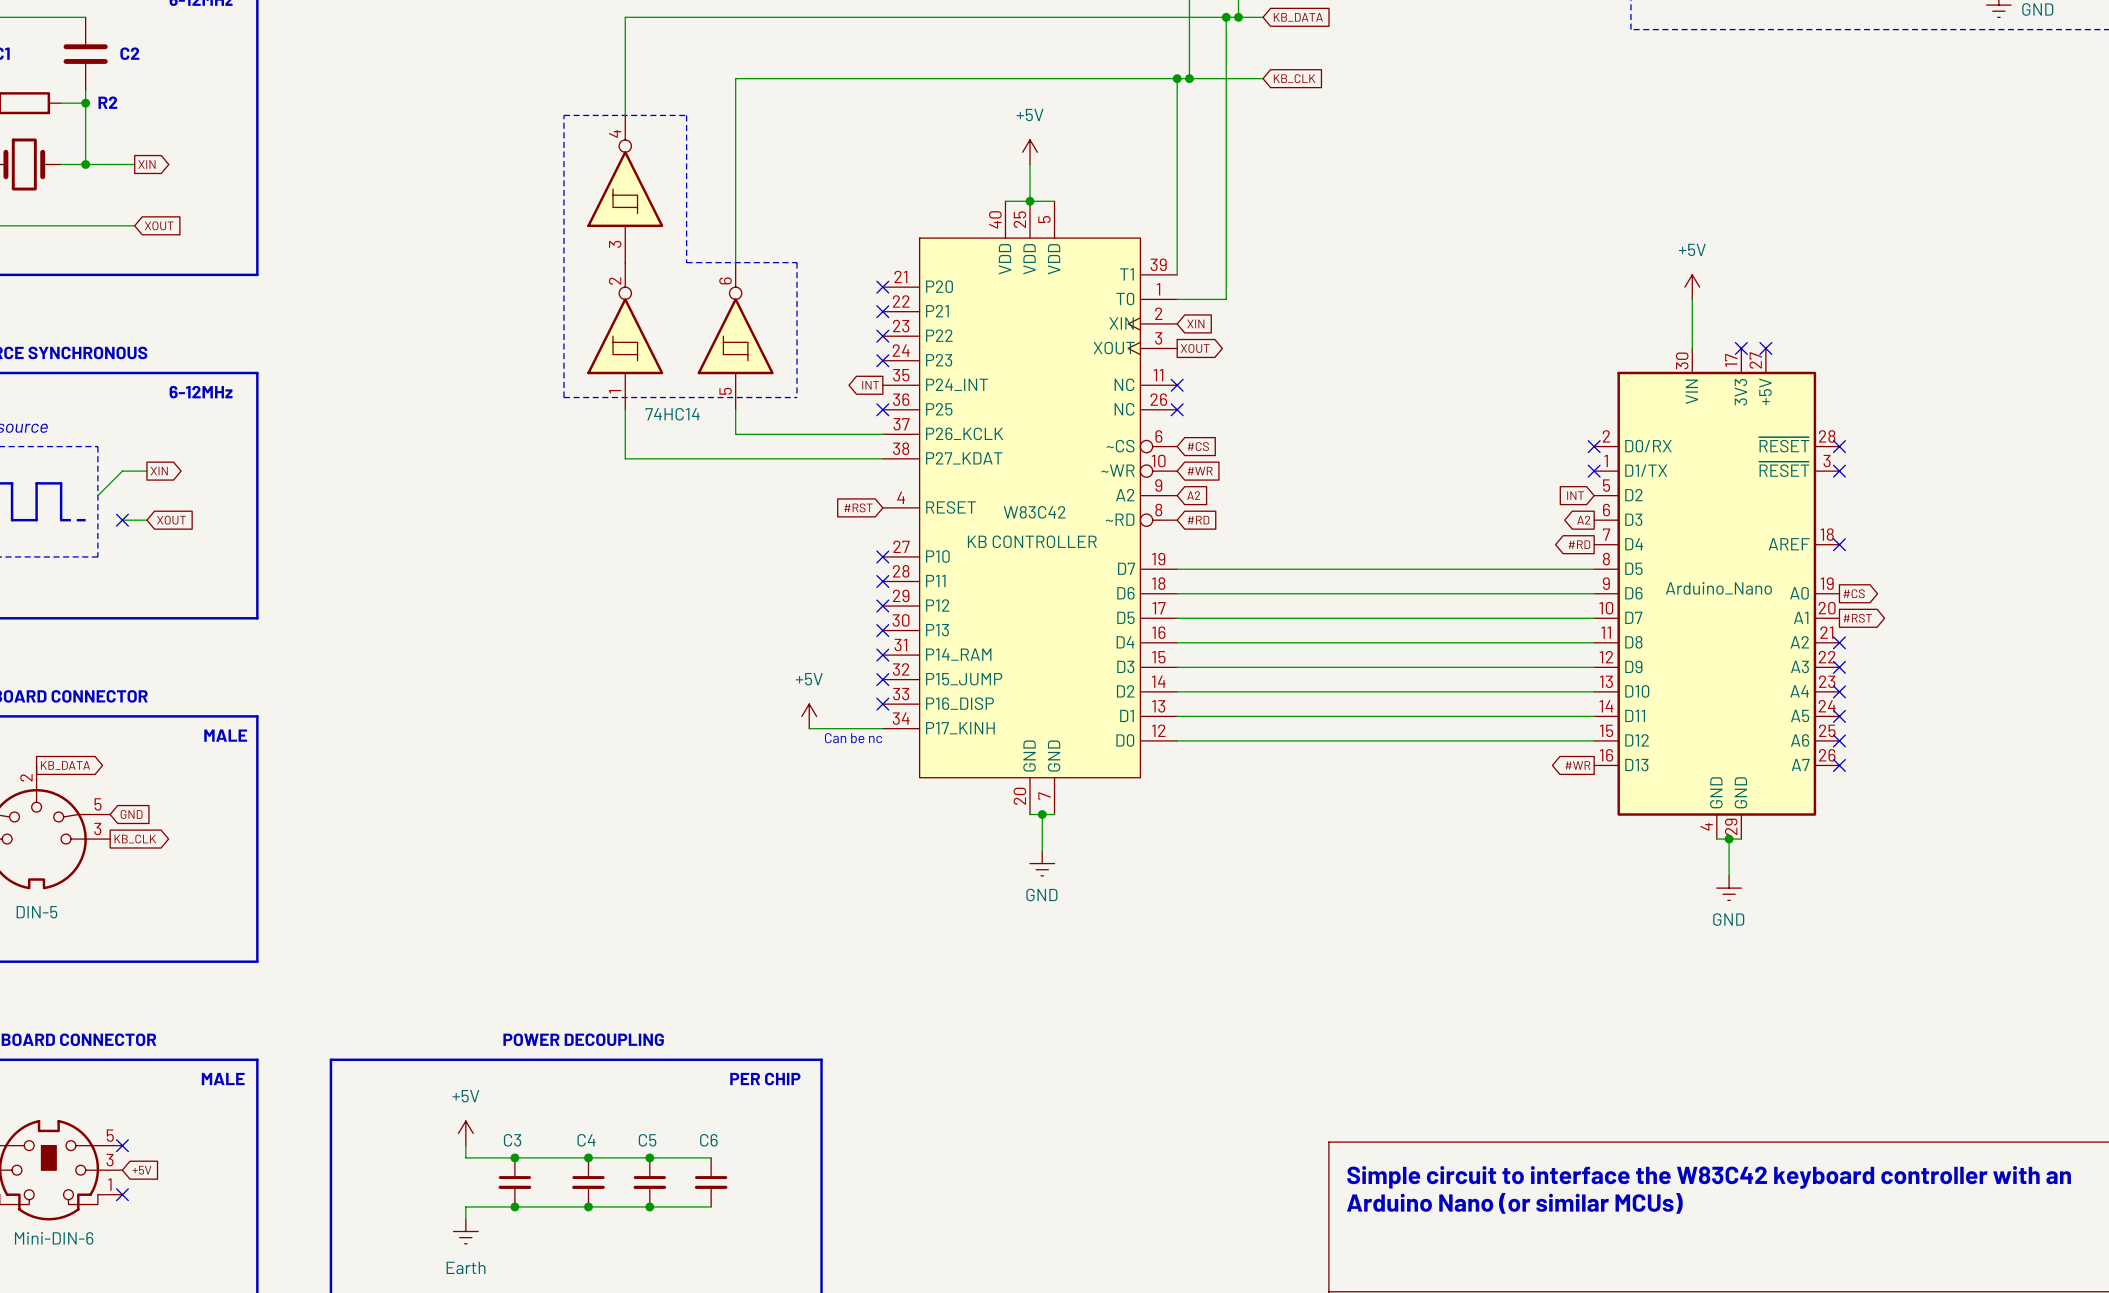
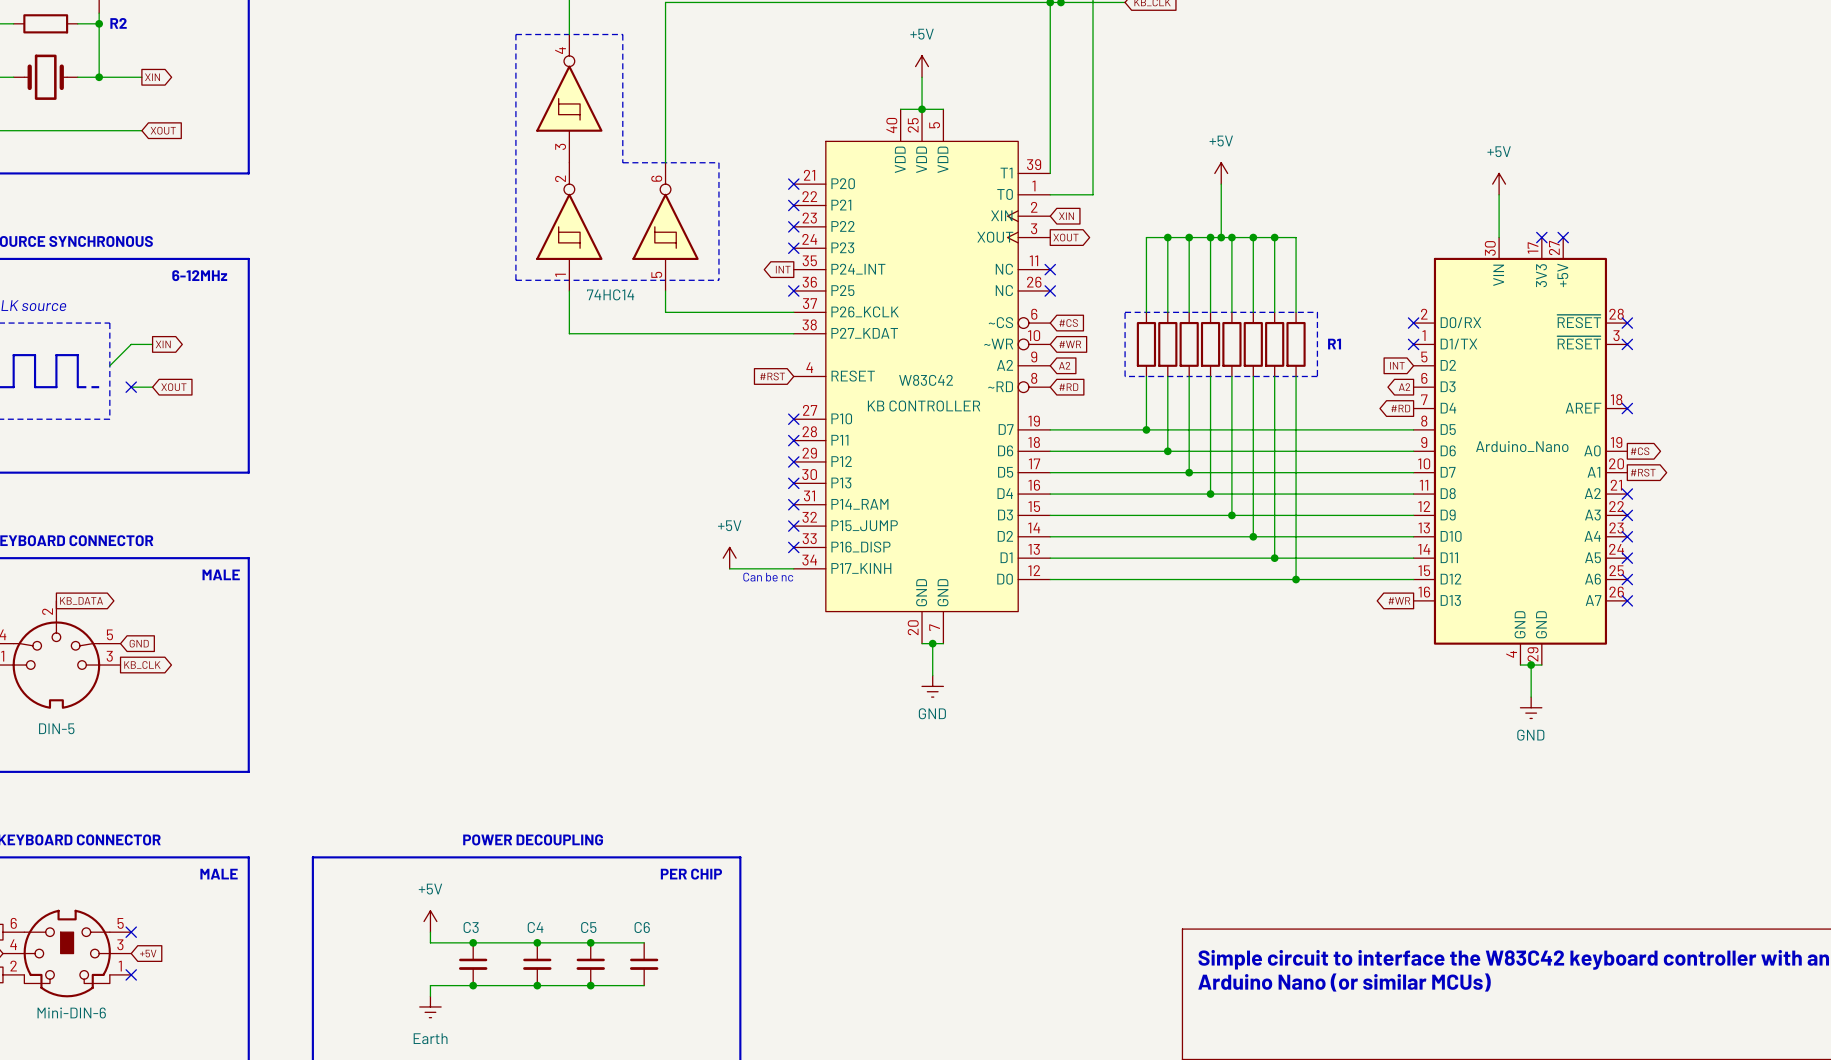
power symbol: none -> +5V (1221, 173)
wire: none -> (1221, 184) (1221, 237)
wire: none -> (1167, 237) (1167, 312)
junction: none -> (1167, 237)
wire: none -> (1189, 237) (1189, 312)
junction: none -> (1189, 237)
wire: none -> (1210, 237) (1210, 312)
junction: none -> (1210, 237)
junction: none -> (1221, 237)
wire: none -> (1231, 237) (1231, 312)
junction: none -> (1231, 237)
wire: none -> (1253, 237) (1253, 312)
junction: none -> (1253, 237)
wire: none -> (1274, 237) (1274, 312)
junction: none -> (1274, 237)
line: none -> (1125, 312) (1317, 312) (1317, 376) (1125, 376) (1125, 312)
wire: none -> (1146, 312) (1146, 237) (1296, 237) (1296, 312)
text: none -> R1 (1334, 344)
part: none -> (1146, 344)
part: none -> (1167, 344)
part: none -> (1189, 344)
part: none -> (1210, 344)
part: none -> (1231, 344)
part: none -> (1253, 344)
part: none -> (1274, 344)
part: none -> (1296, 344)
wire: none -> (1146, 376) (1146, 429)
wire: none -> (1167, 376) (1167, 451)
wire: none -> (1189, 376) (1189, 472)
wire: none -> (1210, 376) (1210, 494)
wire: none -> (1231, 376) (1231, 515)
wire: none -> (1253, 376) (1253, 536)
wire: none -> (1274, 376) (1274, 558)
wire: none -> (1296, 376) (1296, 579)
junction: none -> (1146, 429)
junction: none -> (1167, 451)
junction: none -> (1189, 472)
junction: none -> (1210, 494)
junction: none -> (1231, 515)
junction: none -> (1253, 536)
junction: none -> (1274, 558)
junction: none -> (1296, 579)

